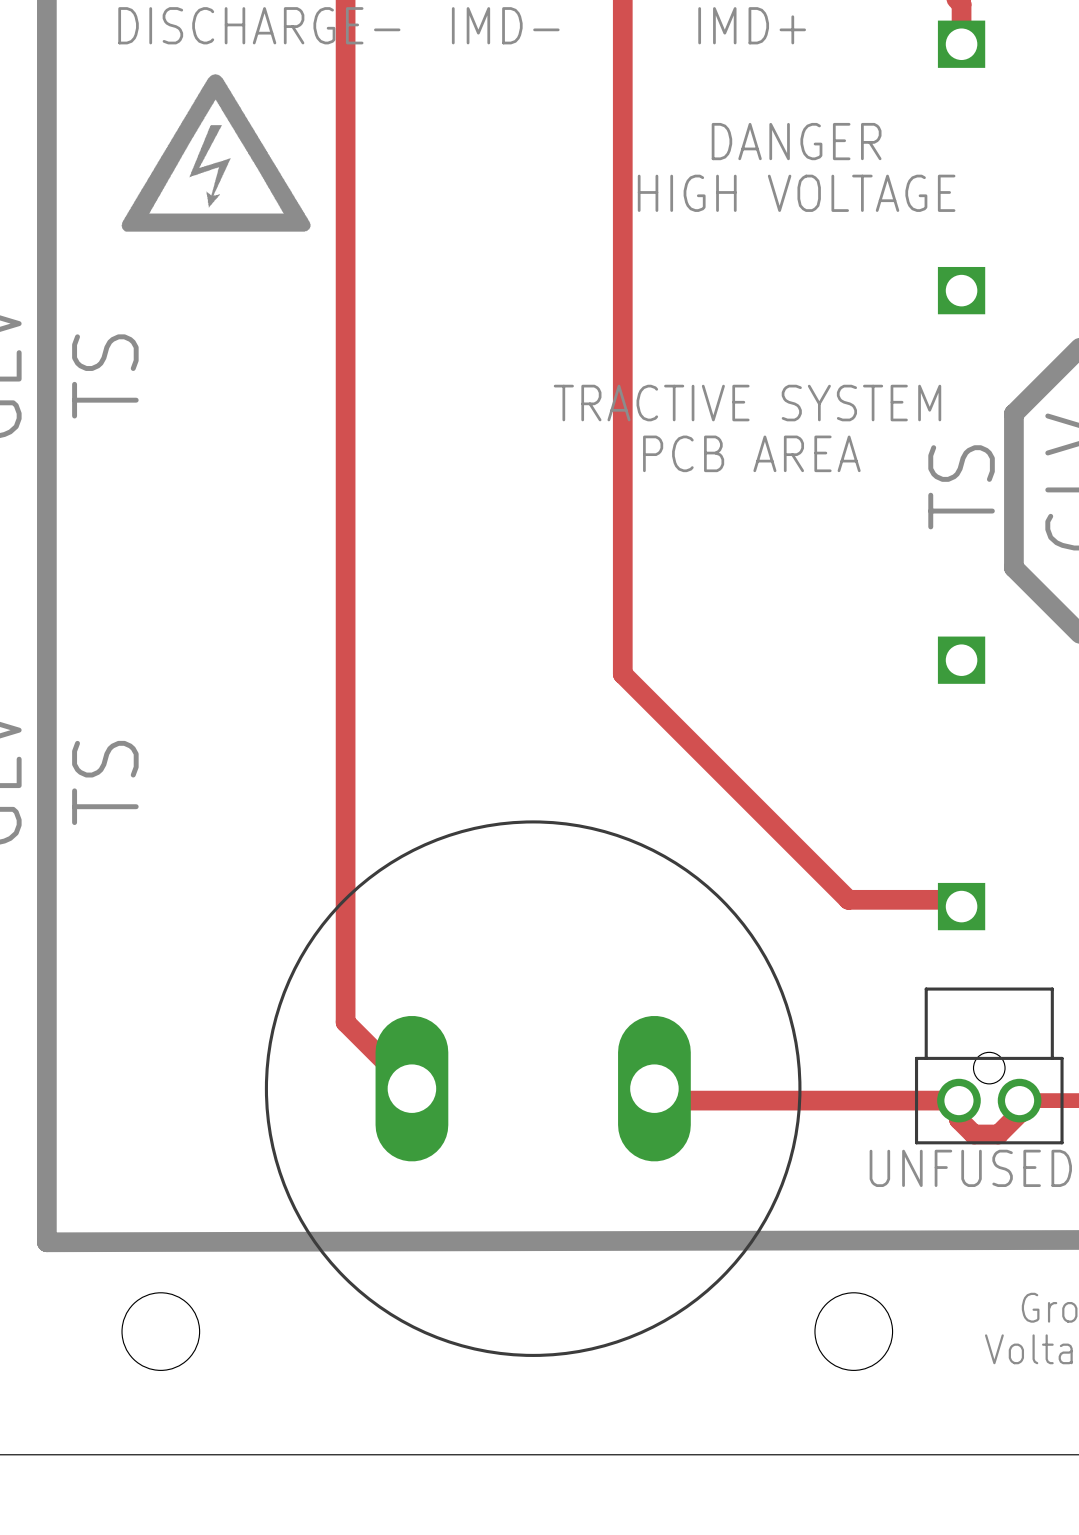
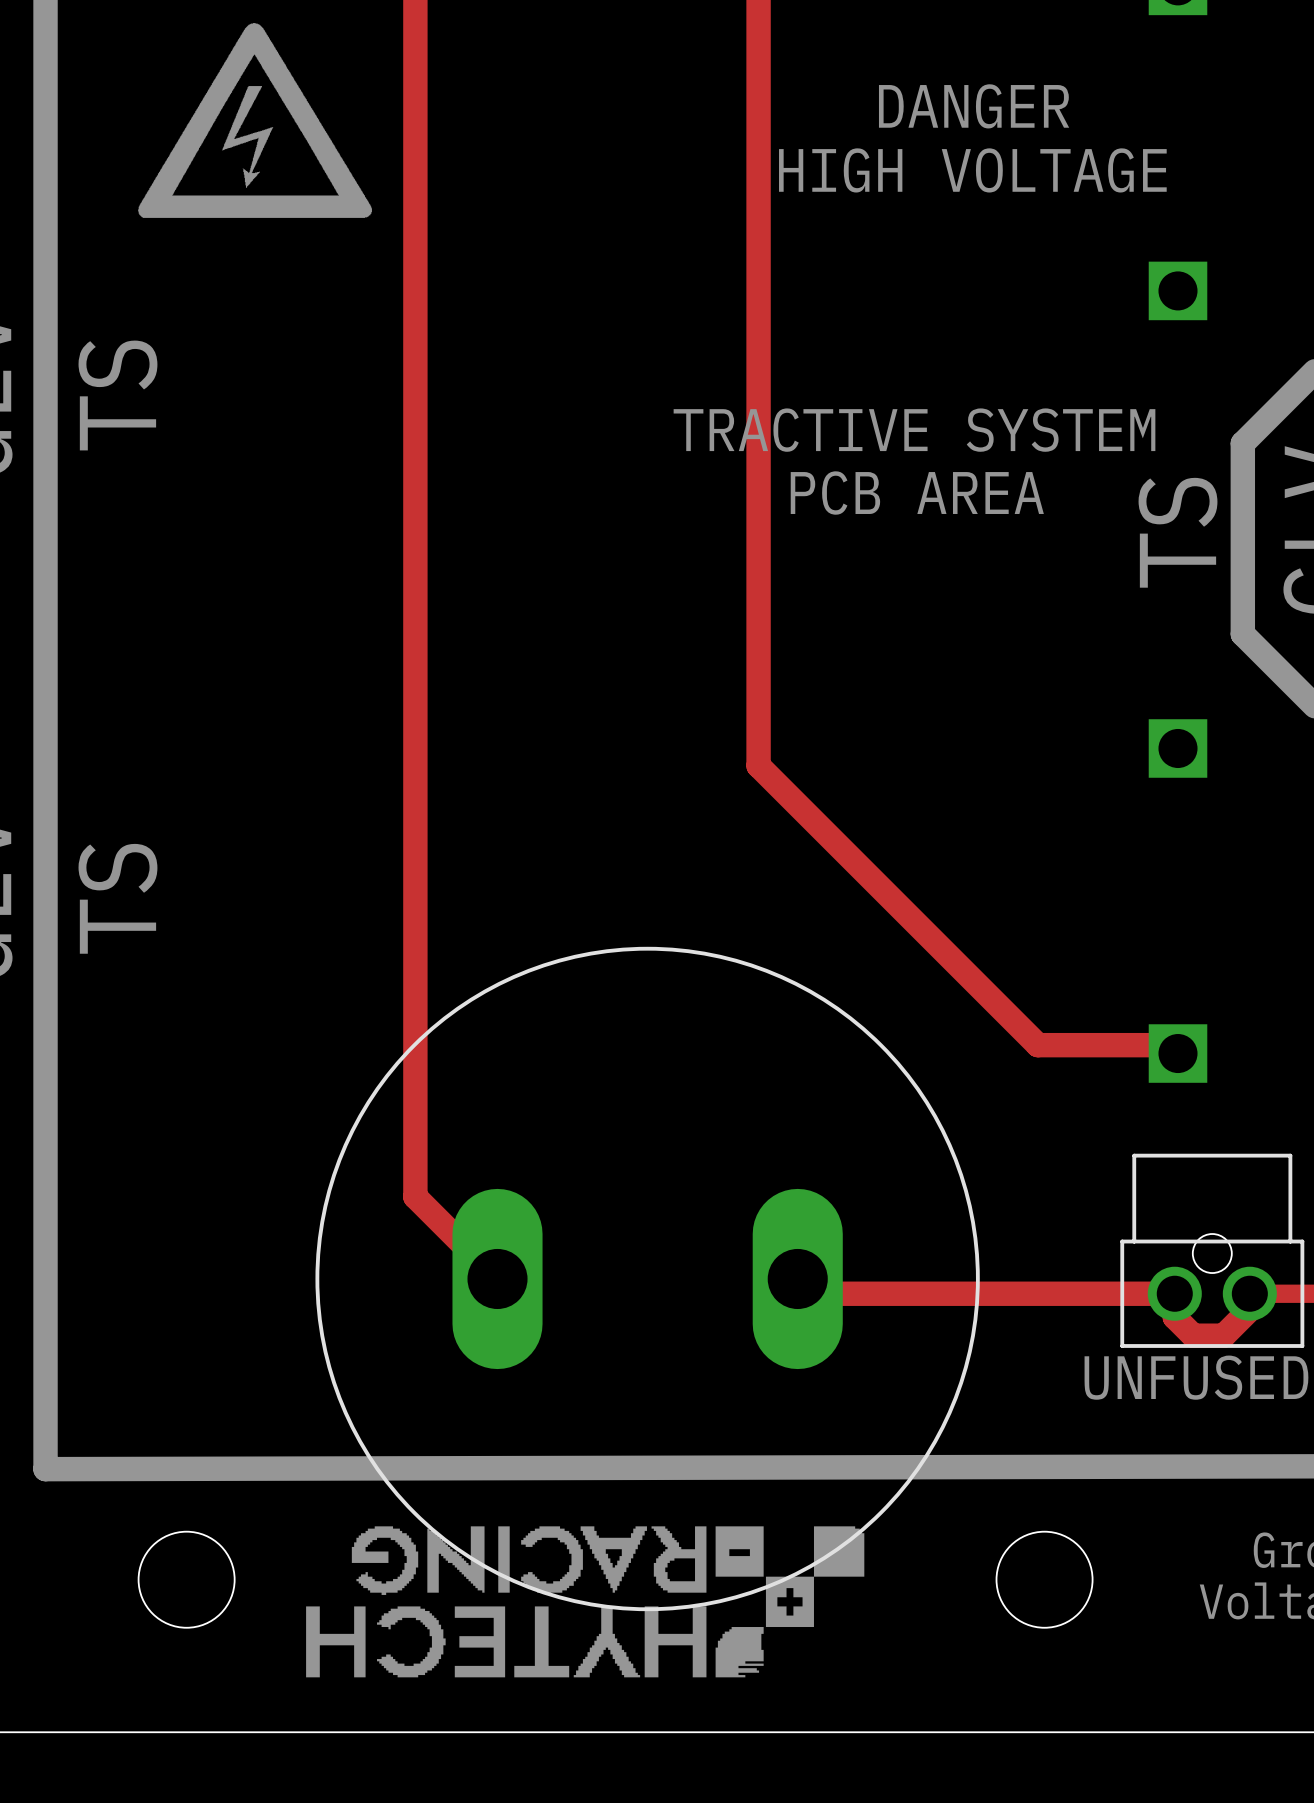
drawing: none -> [306, 1526, 865, 1678]

